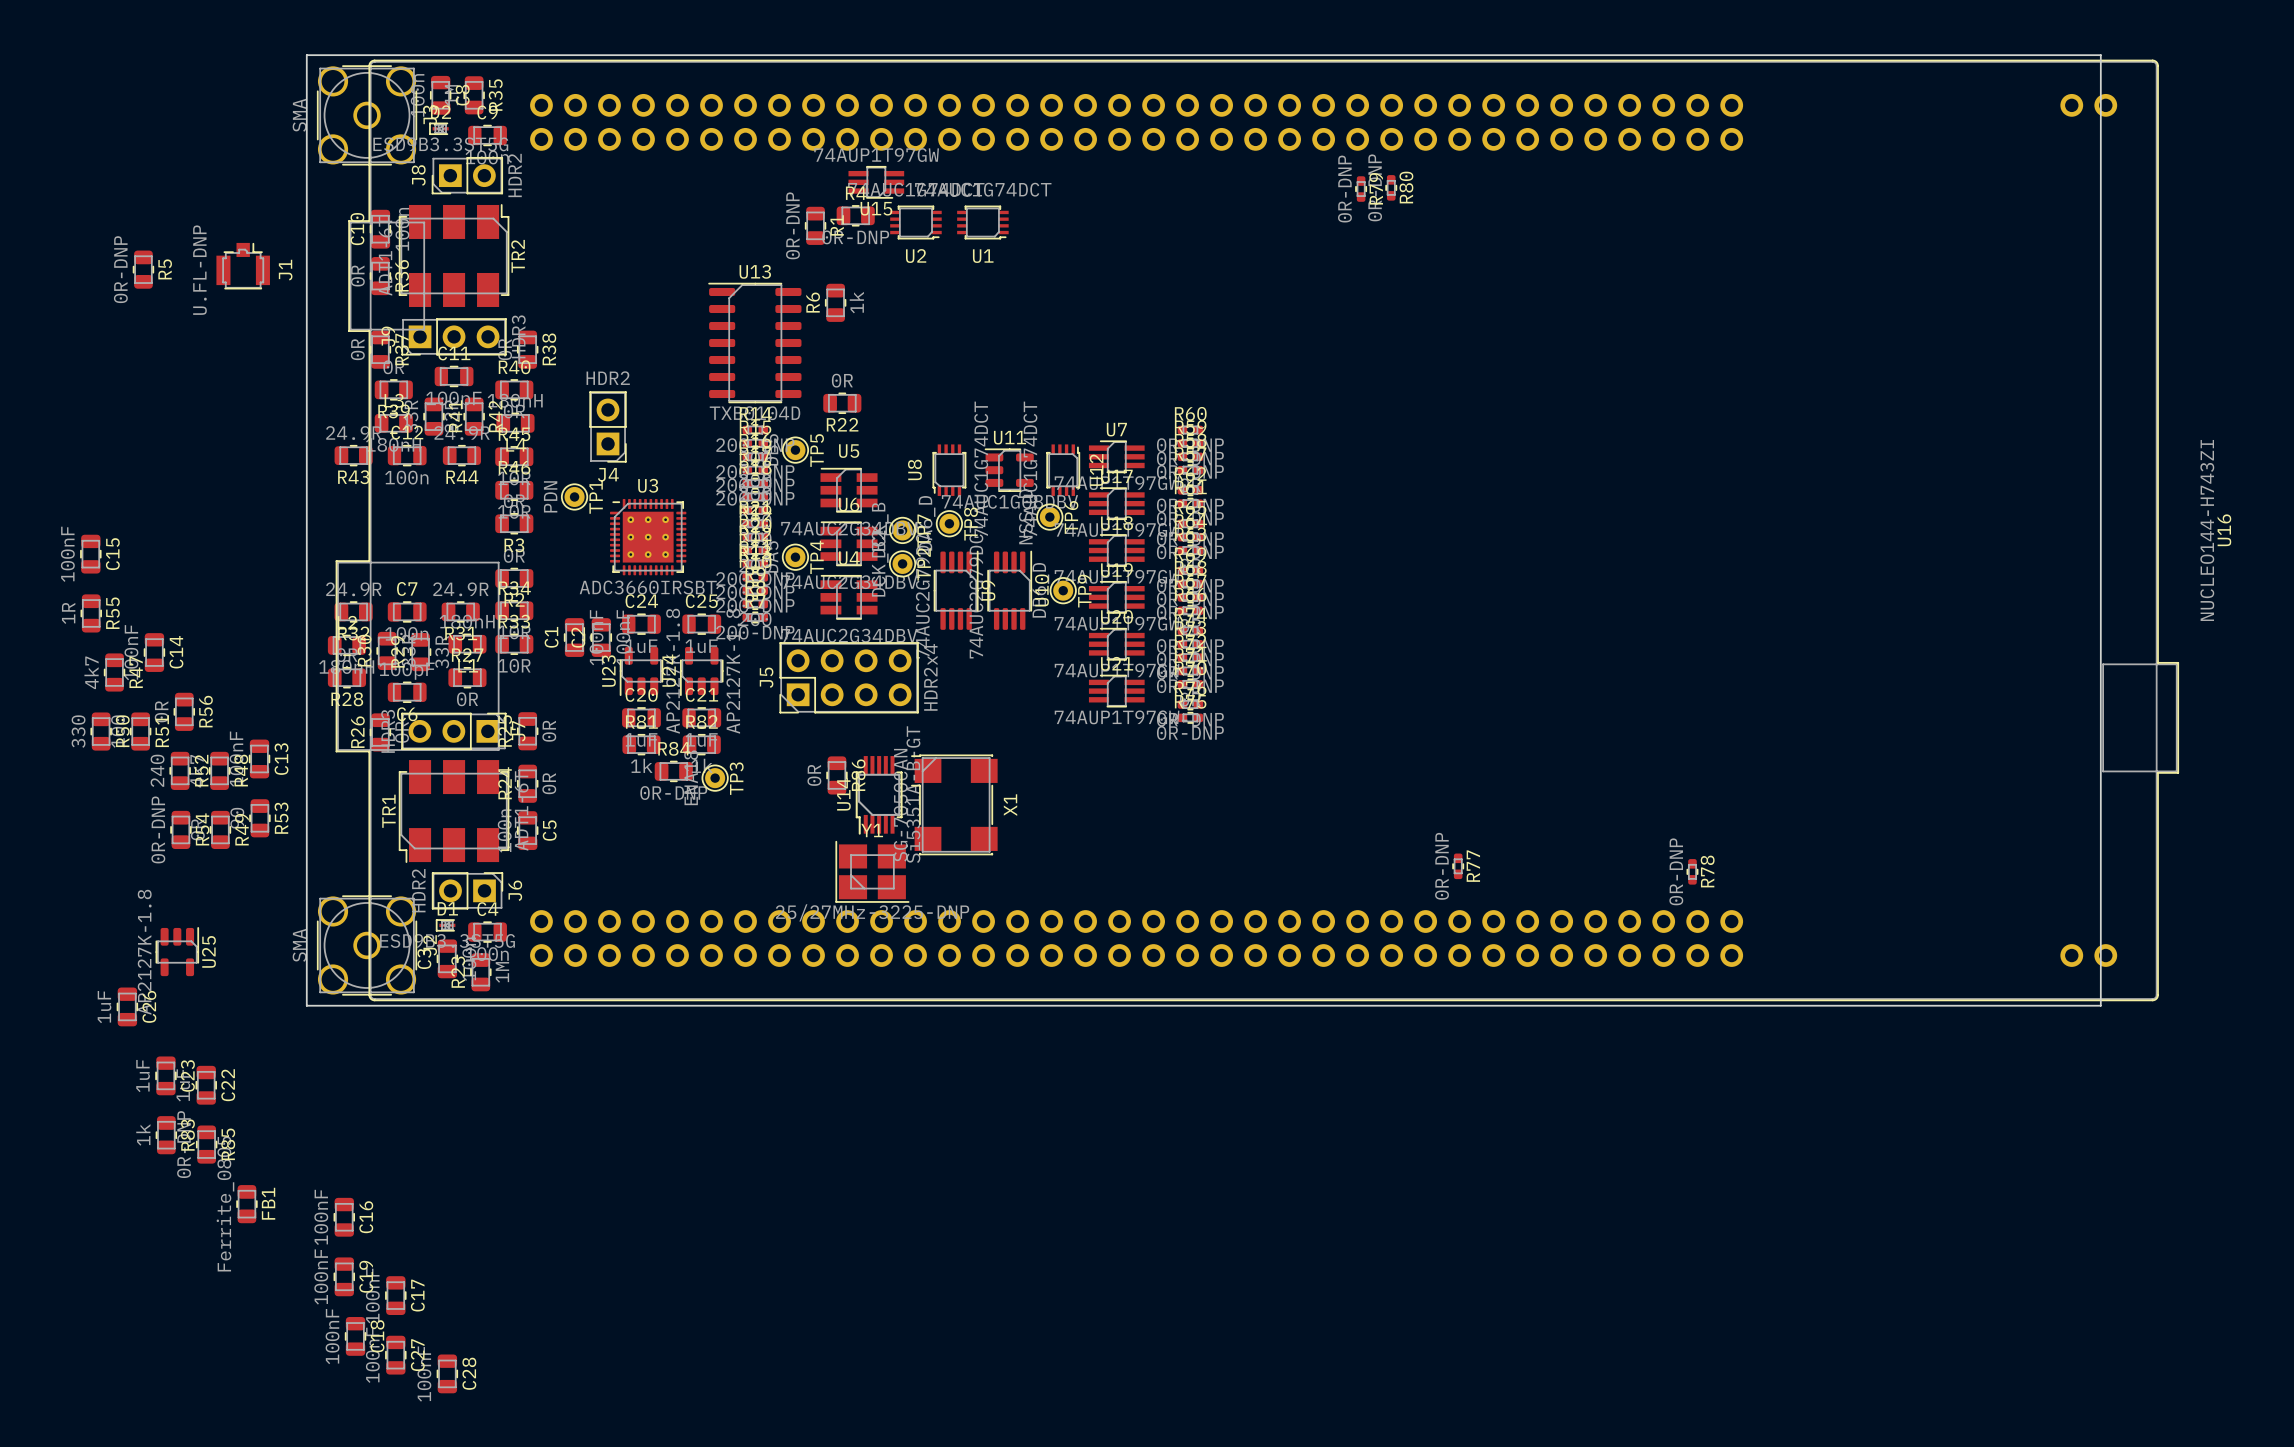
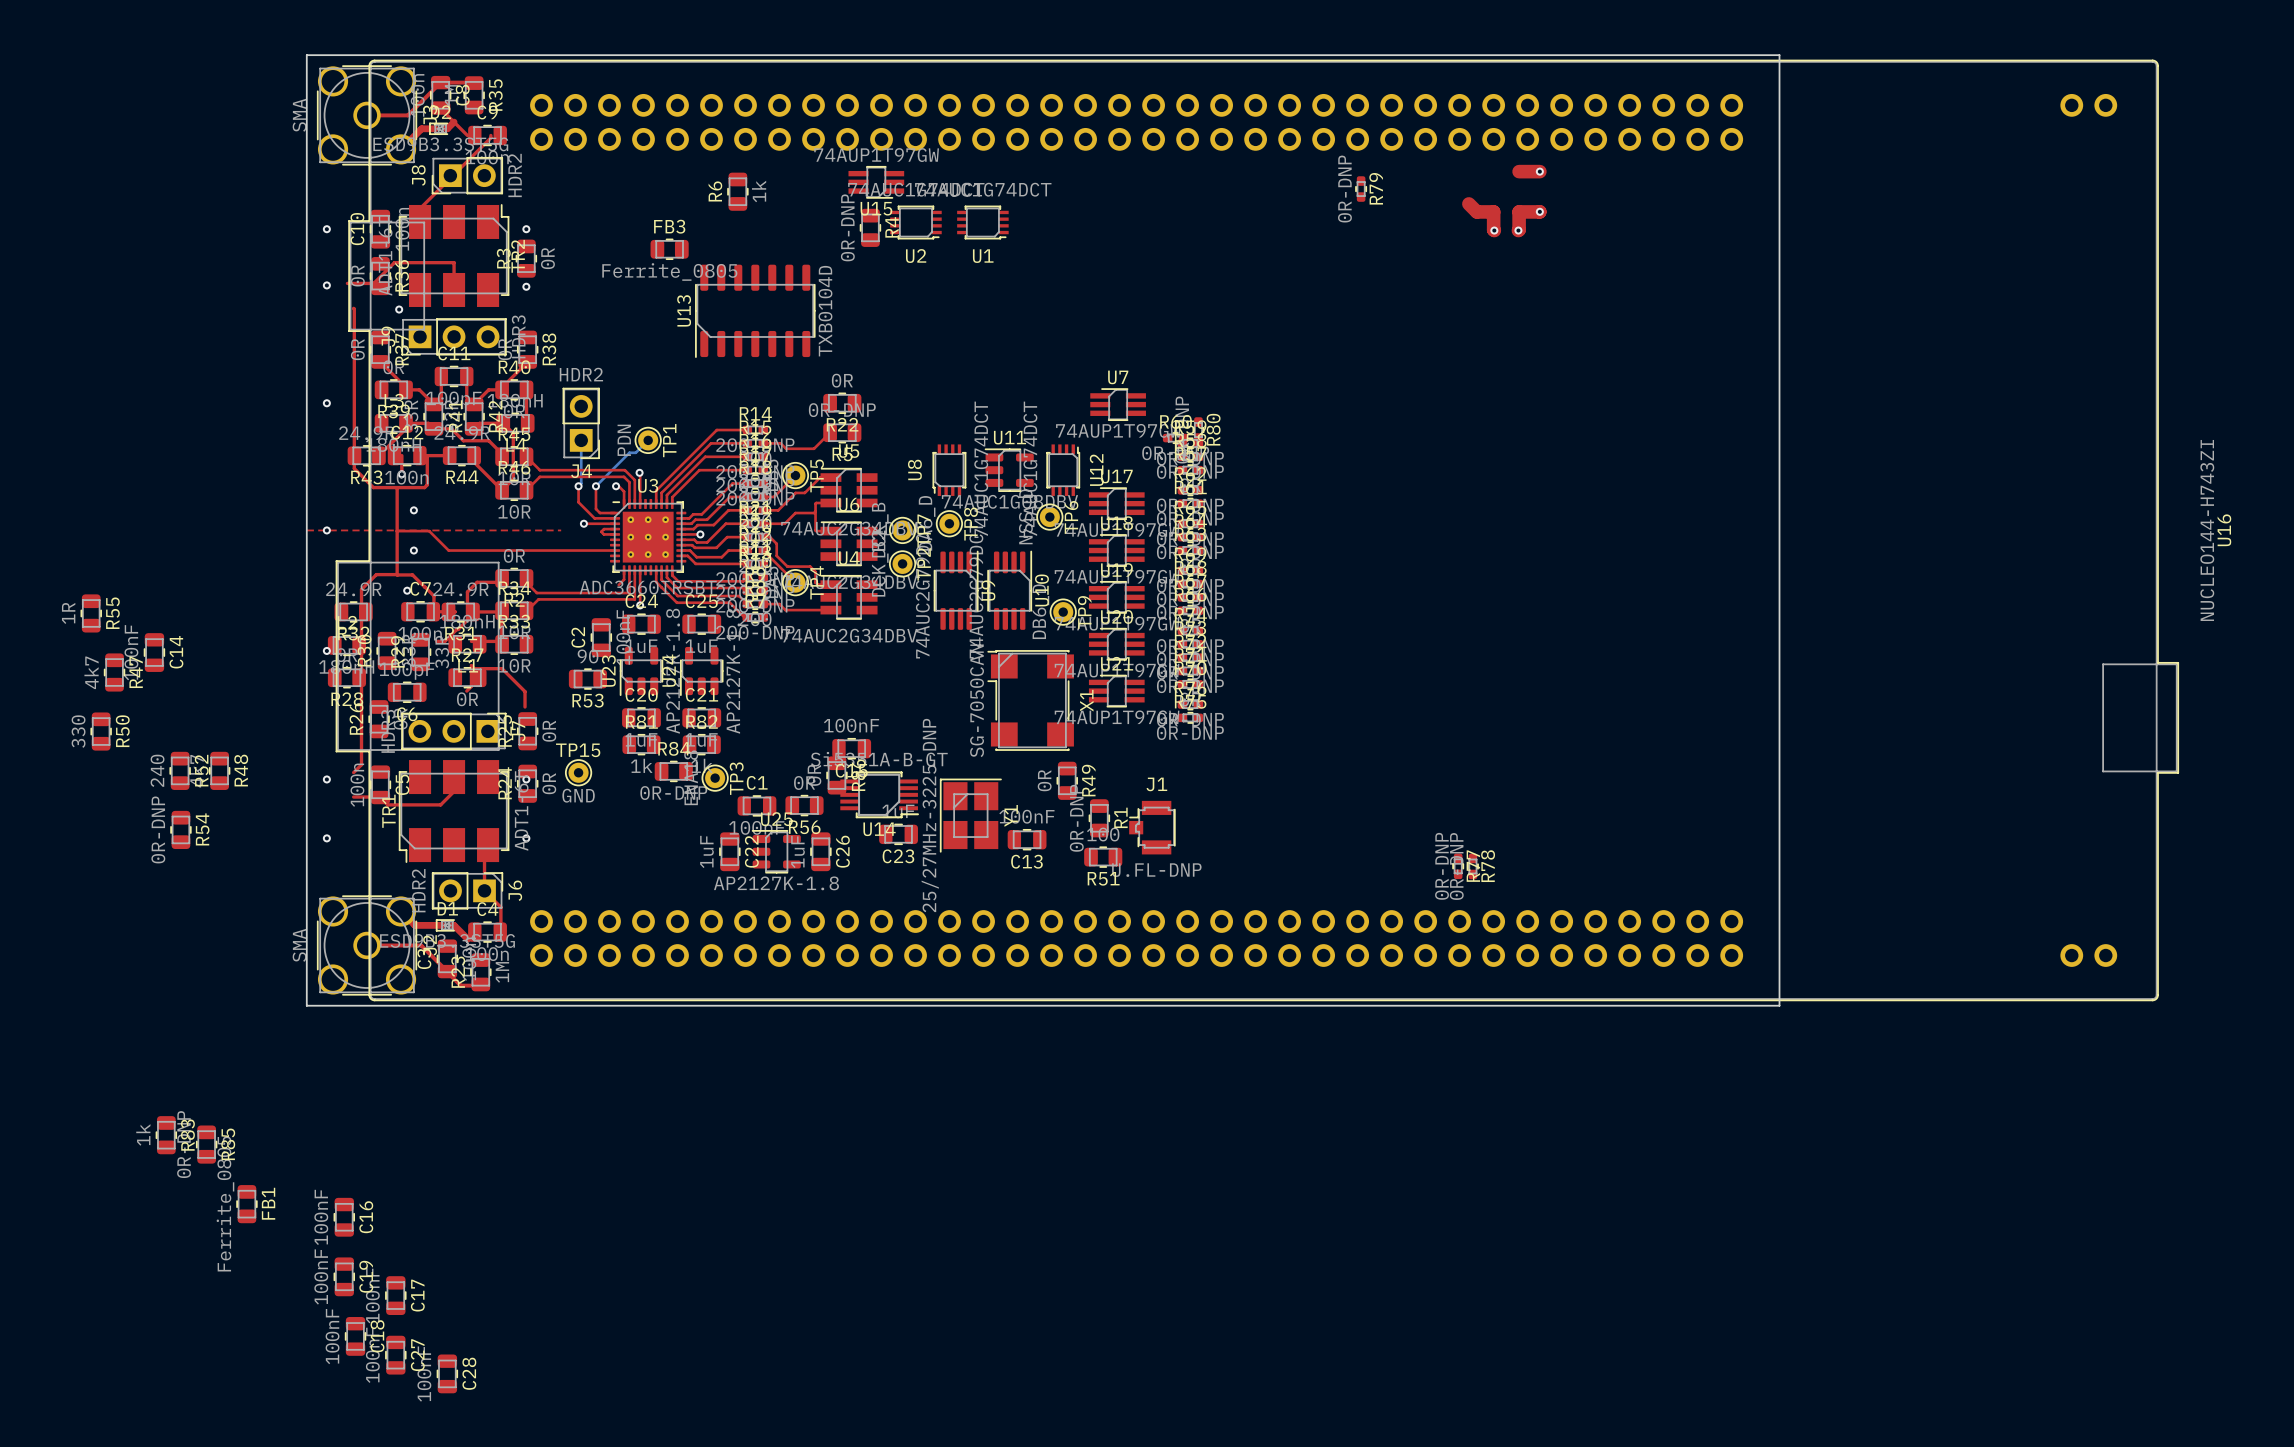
board edge: (1779, 55) (2100, 55) (2100, 1005) (1779, 1005) -> (1779, 55) (1779, 1005)
top track: none -> (474, 83) (440, 82) (407, 115) (367, 115)
top track: none -> (440, 108) (467, 135)
top track: none -> (454, 122) (446, 128)
top track: none -> (435, 128) (421, 128) (401, 149)
top track: none -> (490, 135) (490, 137) (420, 208) (420, 221)
top track: none -> (1519, 171) (1539, 171)
via: none -> (1539, 171)
R80 position: (1391, 187) -> (1198, 430)
top track: none -> (1468, 203) (1476, 211) (1493, 211) (1494, 230)
top track: none -> (1539, 211) (1519, 211) (1518, 230)
via: none -> (1539, 211)
R4 rotation: 0° (855, 215) -> 90° clockwise (870, 227)
R1 position: (815, 225) -> (1099, 818)
via: none -> (326, 229)
via: none -> (526, 229)
via: none -> (1494, 230)
via: none -> (1518, 230)
FB3: none -> Ferrite_0805 (669, 249)
J1 rotation: 0° (243, 266) -> 90° counterclockwise (1152, 827)
J1 position: (243, 266) -> (1152, 827)
R5 rotation: 0° (143, 269) -> 90° clockwise (842, 432)
R5 position: (143, 269) -> (842, 432)
top track: none -> (347, 283) (373, 283) (394, 262) (454, 262) (454, 289)
via: none -> (326, 285)
via: none -> (526, 286)
R6 position: (835, 302) -> (737, 191)
top track: none -> (353, 308) (354, 468) (373, 487) (424, 487) (427, 484) (427, 455) (449, 455)
via: none -> (399, 309)
U13 rotation: 0° (754, 343) -> 90° counterclockwise (755, 311)
top track: none -> (380, 361) (406, 387) (406, 389) (419, 389) (433, 404) (441, 397) (441, 376)
top track: none -> (527, 361) (502, 387) (502, 389) (488, 389) (474, 404) (466, 397) (466, 376)
top track: none -> (526, 389) (527, 423)
via: none -> (326, 403)
J4 position: (608, 426) -> (581, 423)
top track: none -> (474, 428) (479, 423) (503, 423) (513, 433) (513, 479) (502, 490) (474, 462) (474, 455)
top track: none -> (747, 430) (716, 430) (656, 490) (656, 504)
R60 position: (1190, 430) -> (1175, 438)
top track: none -> (830, 432) (814, 448) (786, 448) (780, 443) (763, 443)
bottom track: none -> (581, 440) (581, 483) (578, 486)
bottom track: none -> (648, 440) (635, 452) (629, 452) (595, 486)
top track: none -> (747, 443) (711, 443) (661, 492) (661, 504)
TP5 position: (795, 450) -> (795, 475)
R43 position: (353, 455) -> (366, 455)
top track: none -> (378, 455) (406, 428) (406, 423) (428, 423) (433, 428) (451, 428) (463, 440) (488, 440) (502, 453) (502, 456)
top track: none -> (401, 455) (401, 474)
top track: none -> (526, 456) (539, 470) (624, 470) (634, 480) (634, 504)
top track: none -> (747, 456) (705, 456) (666, 495) (666, 504)
U7 position: (1116, 456) -> (1118, 404)
top track: none -> (747, 470) (699, 470) (672, 497) (672, 504)
top track: none -> (639, 472) (640, 504)
via: none -> (639, 472)
via: none -> (401, 474)
top track: none -> (795, 475) (774, 496) (763, 496)
top track: none -> (830, 477) (820, 477) (804, 492) (795, 492) (778, 510) (763, 510)
top track: none -> (747, 483) (732, 483) (701, 514) (693, 514) (689, 518) (681, 518)
top track: none -> (578, 486) (578, 502) (594, 518) (615, 518)
via: none -> (578, 486)
top track: none -> (595, 486) (595, 509) (599, 513) (615, 513)
via: none -> (595, 486)
top track: none -> (616, 486) (624, 491) (624, 504)
via: none -> (616, 486)
top track: none -> (397, 487) (397, 574)
top track: none -> (526, 490) (539, 476) (624, 476) (629, 482) (629, 504)
TP1 position: (574, 496) -> (648, 440)
top track: none -> (747, 496) (729, 496) (707, 519) (695, 519) (691, 523) (681, 523)
top track: none -> (830, 502) (815, 503) (815, 530) (830, 531)
via: none -> (413, 510)
top track: none -> (747, 510) (728, 510) (713, 525) (697, 525) (693, 529) (681, 529)
top track: none -> (815, 511) (795, 513) (784, 523) (763, 523)
R3 rotation: 0° (514, 523) -> 90° clockwise (526, 258)
R3 position: (514, 523) -> (526, 258)
top track: none -> (583, 523) (615, 523)
via: none -> (583, 523)
top track: none -> (747, 523) (725, 523) (707, 542) (681, 539)
top track: none -> (615, 529) (604, 529) (601, 531) (604, 534) (615, 534)
top zone outline: none -> (306, 530) (561, 530)
via: none -> (326, 530)
top track: none -> (397, 531) (429, 531) (448, 550) (615, 550)
top track: none -> (681, 534) (700, 534)
via: none -> (700, 534)
top track: none -> (747, 537) (727, 537) (716, 547) (694, 547) (692, 545) (681, 545)
top track: none -> (763, 537) (770, 537) (776, 543) (776, 555) (787, 566) (810, 566) (815, 571) (815, 582) (817, 584) (830, 584)
via: none -> (413, 550)
top track: none -> (681, 550) (689, 550) (696, 557) (721, 557) (728, 550) (747, 550)
top track: none -> (763, 550) (795, 582)
C15 rotation: 0° (90, 554) -> 90° clockwise (851, 748)
C15 position: (90, 554) -> (851, 748)
top track: none -> (681, 555) (687, 555) (695, 563) (747, 563)
TP4 position: (795, 557) -> (795, 582)
top track: none -> (624, 570) (624, 579) (618, 585)
top track: none -> (629, 570) (629, 593) (536, 593) (526, 582)
top track: none -> (634, 570) (634, 599) (538, 599) (525, 612)
top track: none -> (640, 570) (640, 605)
top track: none -> (656, 570) (656, 582) (676, 602) (729, 602) (744, 617) (747, 617)
top track: none -> (661, 570) (661, 579) (677, 596) (739, 596) (742, 598)
top track: none -> (666, 570) (666, 577) (677, 588) (744, 588) (747, 590)
top track: none -> (672, 570) (672, 575) (678, 581) (743, 581) (747, 577)
top track: none -> (397, 574) (376, 574) (361, 589) (361, 764) (353, 772)
top track: none -> (397, 574) (412, 574) (433, 596) (433, 611) (455, 611)
top track: none -> (501, 582) (477, 582) (467, 592) (467, 620) (444, 641) (436, 641)
via: none -> (407, 590)
TP9 position: (1063, 590) -> (1063, 612)
top track: none -> (763, 604) (779, 604) (785, 610) (830, 610)
via: none -> (640, 605)
C7 position: (407, 611) -> (420, 611)
top track: none -> (479, 611) (501, 612) (501, 641) (471, 641)
C1 rotation: 0° (574, 637) -> 90° clockwise (756, 805)
C1 position: (574, 637) -> (756, 805)
via: none -> (326, 650)
J5: HDR2x4 (849, 677) -> none
top track: none -> (466, 691) (471, 686) (471, 665) (474, 668) (502, 668) (525, 691) (525, 707)
R56 rotation: 0° (184, 711) -> 90° clockwise (804, 805)
R56 position: (184, 711) -> (804, 805)
R51 rotation: 0° (140, 731) -> 90° clockwise (1103, 857)
R51 position: (140, 731) -> (1103, 857)
R26 position: (380, 732) -> (379, 719)
C13 rotation: 0° (259, 758) -> 90° clockwise (1027, 839)
C13 position: (259, 758) -> (1027, 839)
TP15: none -> GND (578, 772)
top track: none -> (454, 777) (454, 791) (440, 804) (387, 804) (379, 797) (353, 797)
via: none -> (326, 779)
via: none -> (526, 779)
U14 rotation: 0° (879, 795) -> 90° counterclockwise (879, 794)
X1 position: (954, 804) -> (1030, 700)
R53 rotation: 0° (259, 818) -> 90° clockwise (587, 679)
R53 position: (259, 818) -> (587, 679)
R49 position: (220, 829) -> (1067, 780)
C5 position: (527, 830) -> (380, 784)
via: none -> (326, 838)
via: none -> (526, 838)
top track: none -> (488, 845) (484, 848) (484, 890) (500, 907) (500, 932)
Y1 rotation: 0° (872, 871) -> 90° clockwise (970, 815)
Y1 position: (872, 871) -> (970, 815)
R78 position: (1692, 871) -> (1472, 866)
top track: none -> (401, 911) (414, 925) (441, 925)
top track: none -> (452, 925) (467, 939)
top track: none -> (367, 945) (421, 945) (460, 985) (480, 984)
U25 rotation: 0° (177, 951) -> 90° counterclockwise (776, 851)
U25 position: (177, 951) -> (776, 851)
C26 position: (127, 1006) -> (820, 851)
C23 rotation: 0° (165, 1075) -> 90° clockwise (898, 834)
C23 position: (165, 1075) -> (898, 834)
C22 position: (206, 1085) -> (729, 851)

